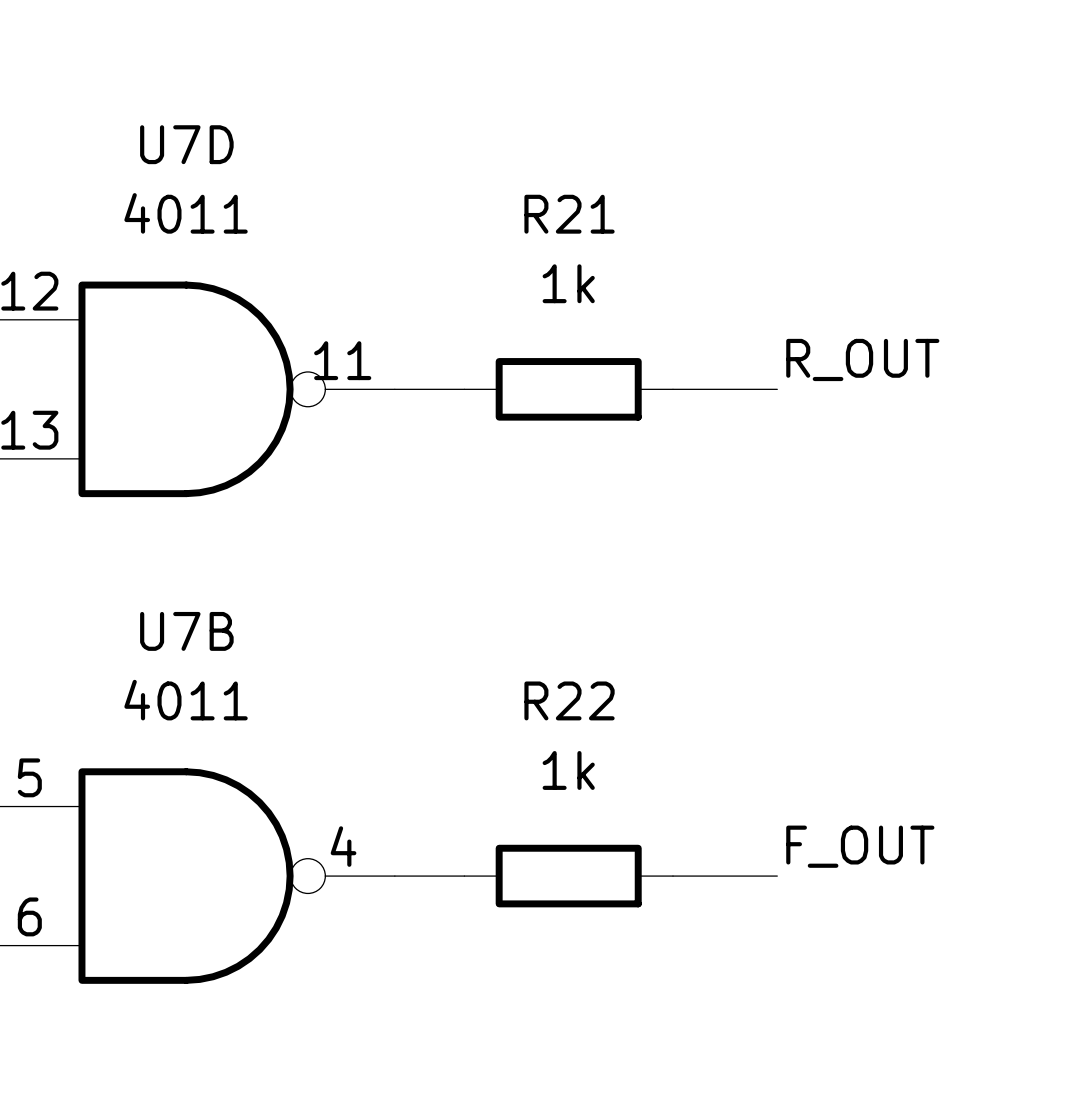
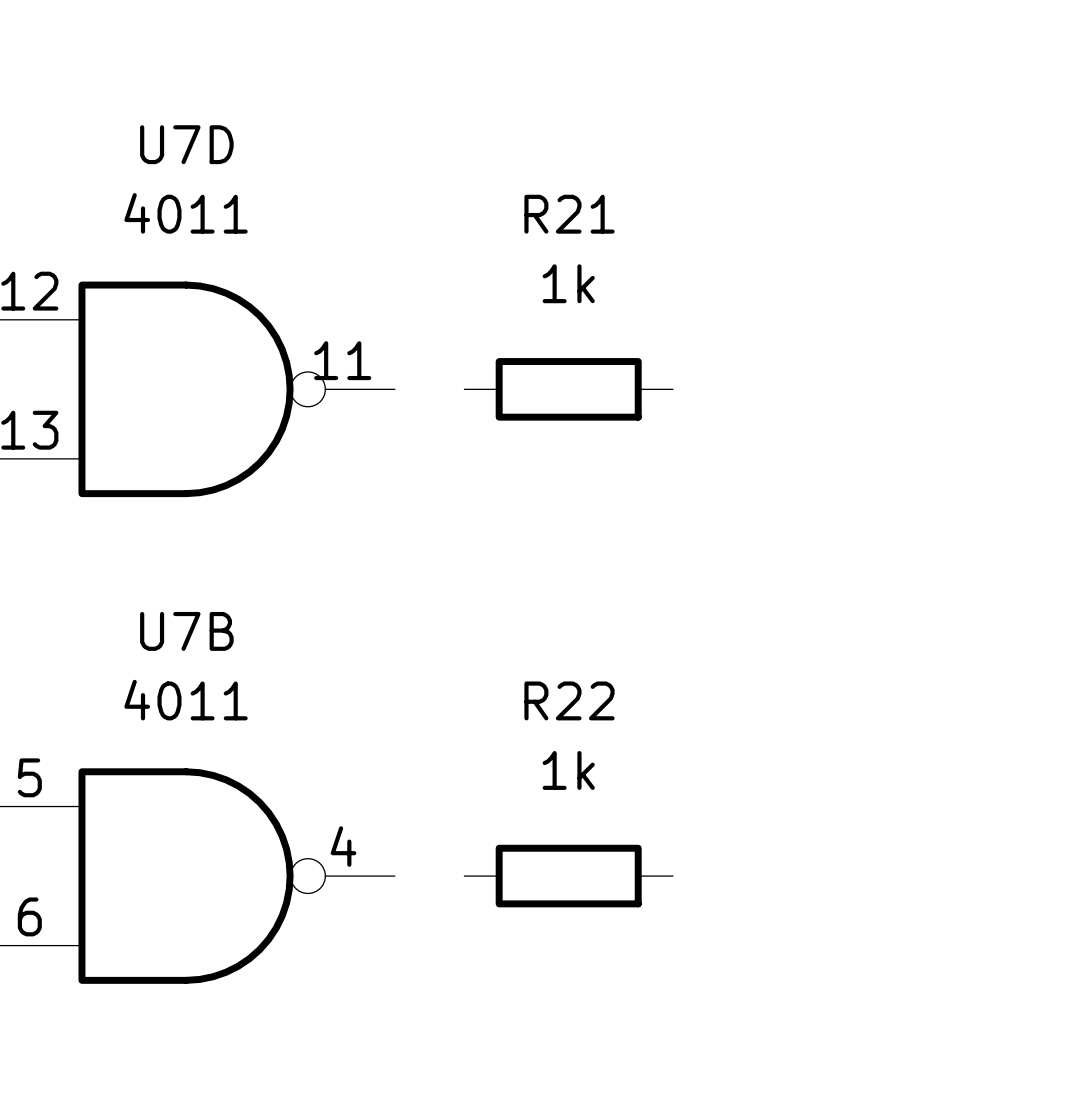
label: R_OUT (862, 359) -> none
wire: (394, 389) (464, 389) -> none
wire: (672, 389) (777, 389) -> none
label: F_OUT (860, 846) -> none
wire: (394, 876) (464, 876) -> none
wire: (672, 876) (777, 876) -> none

